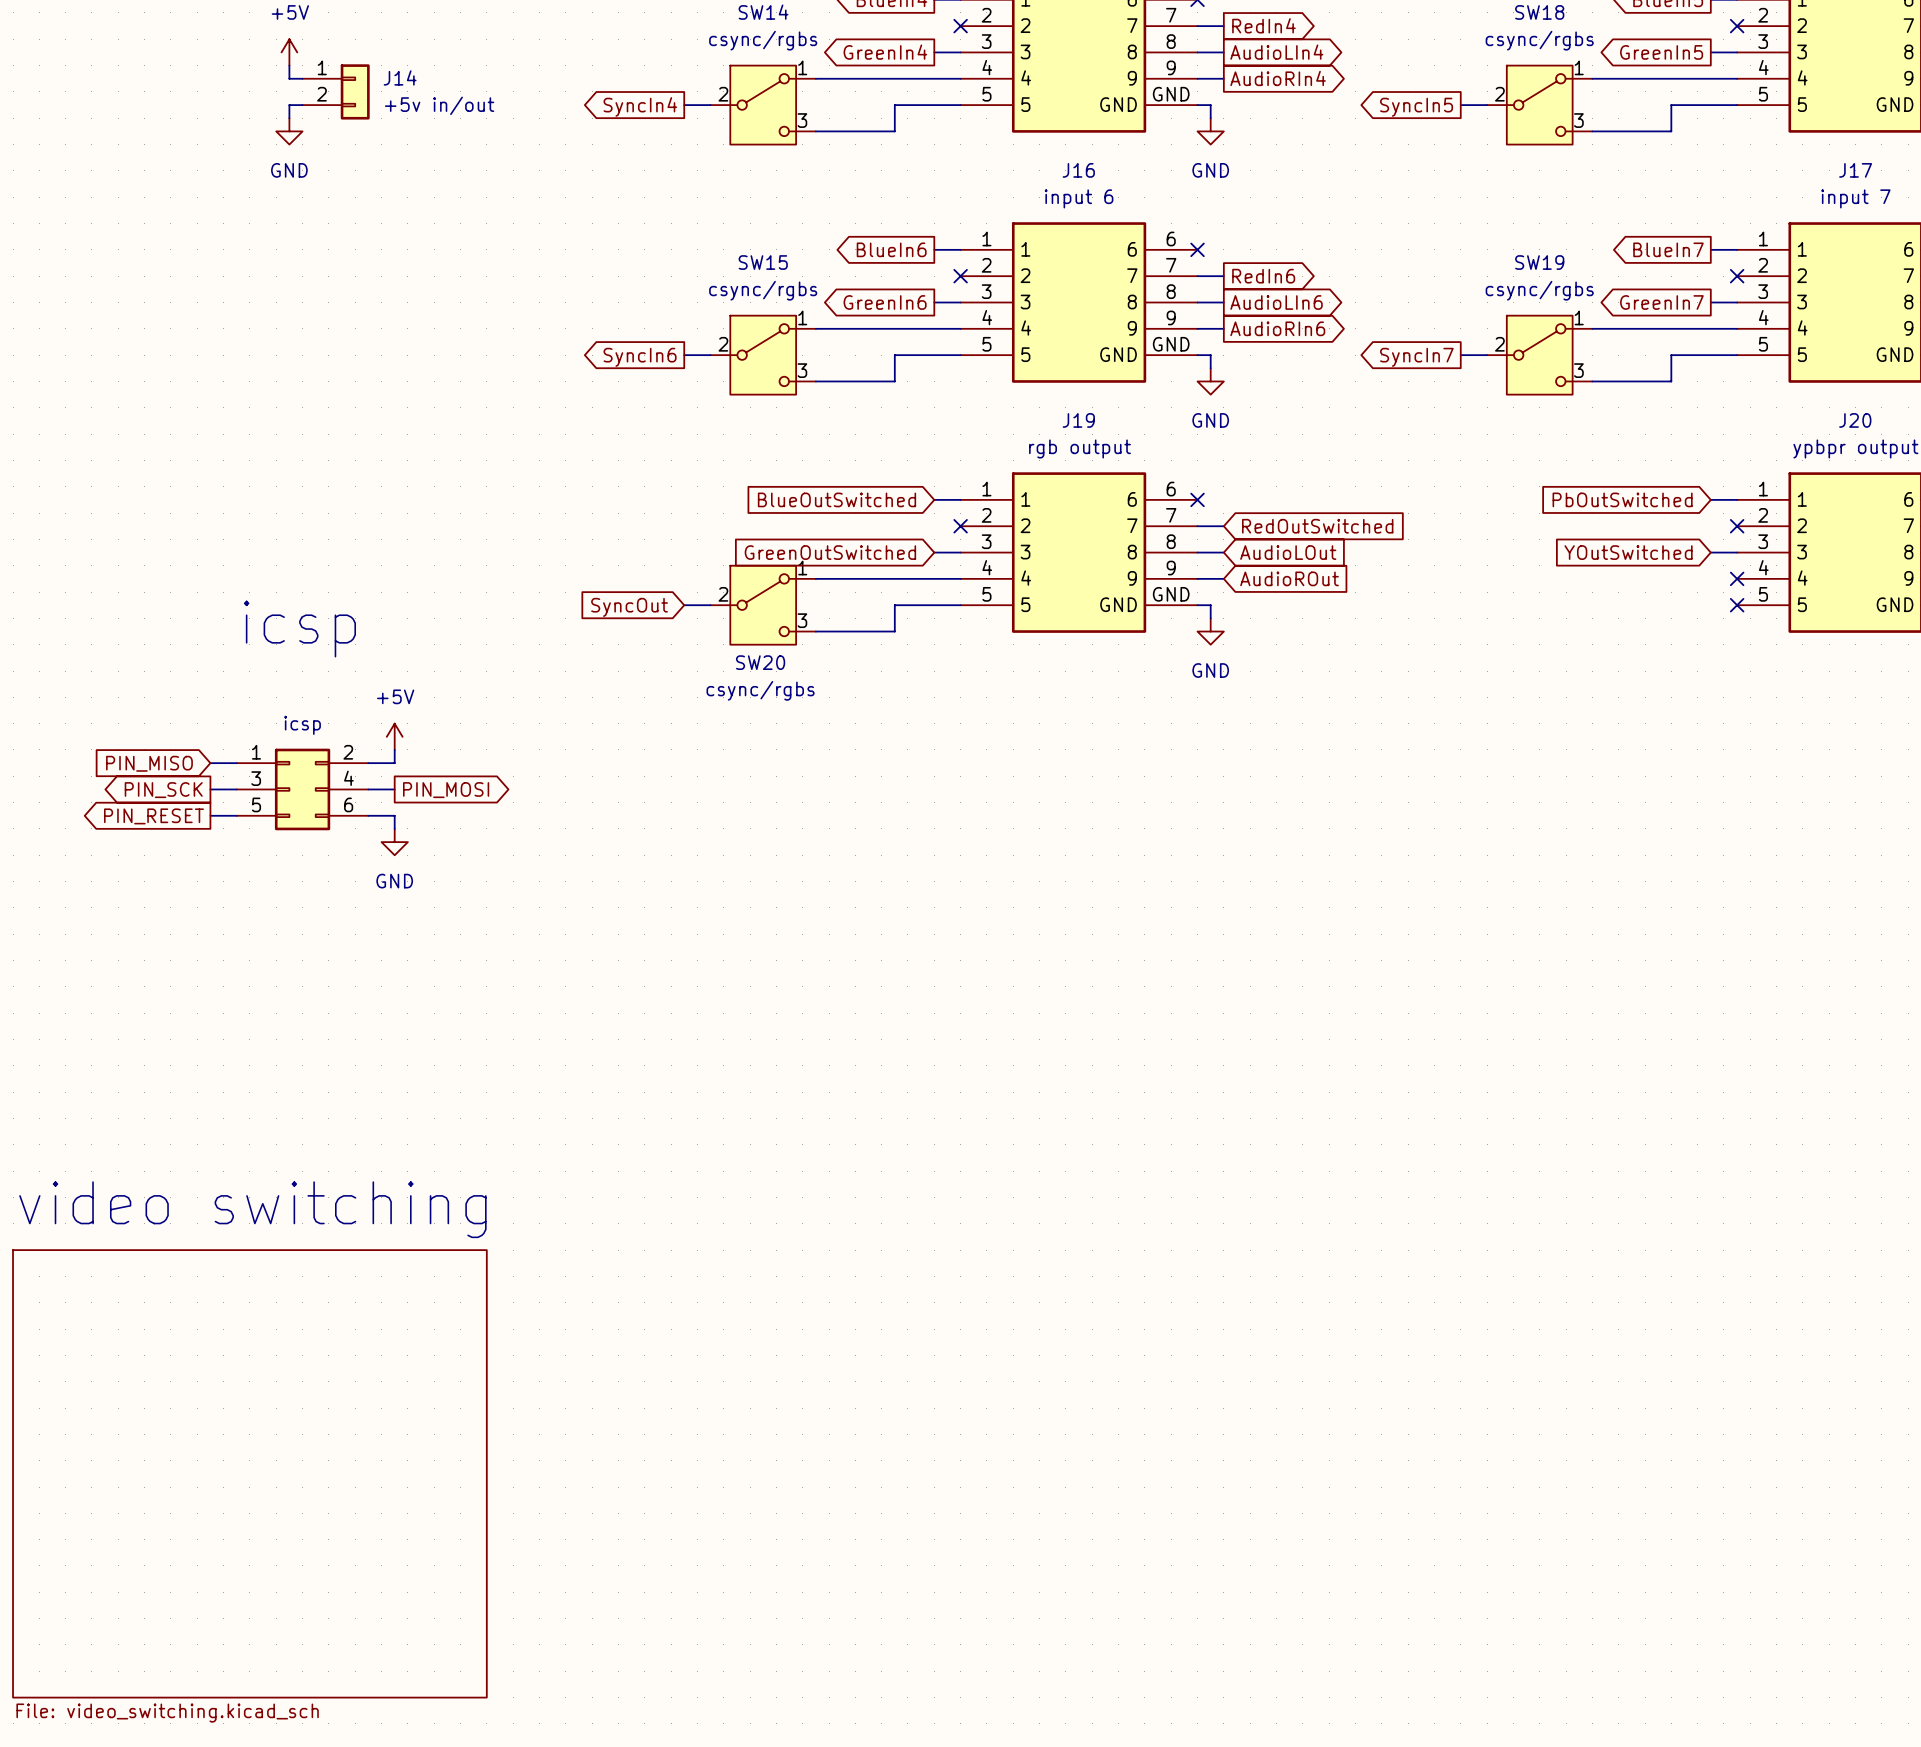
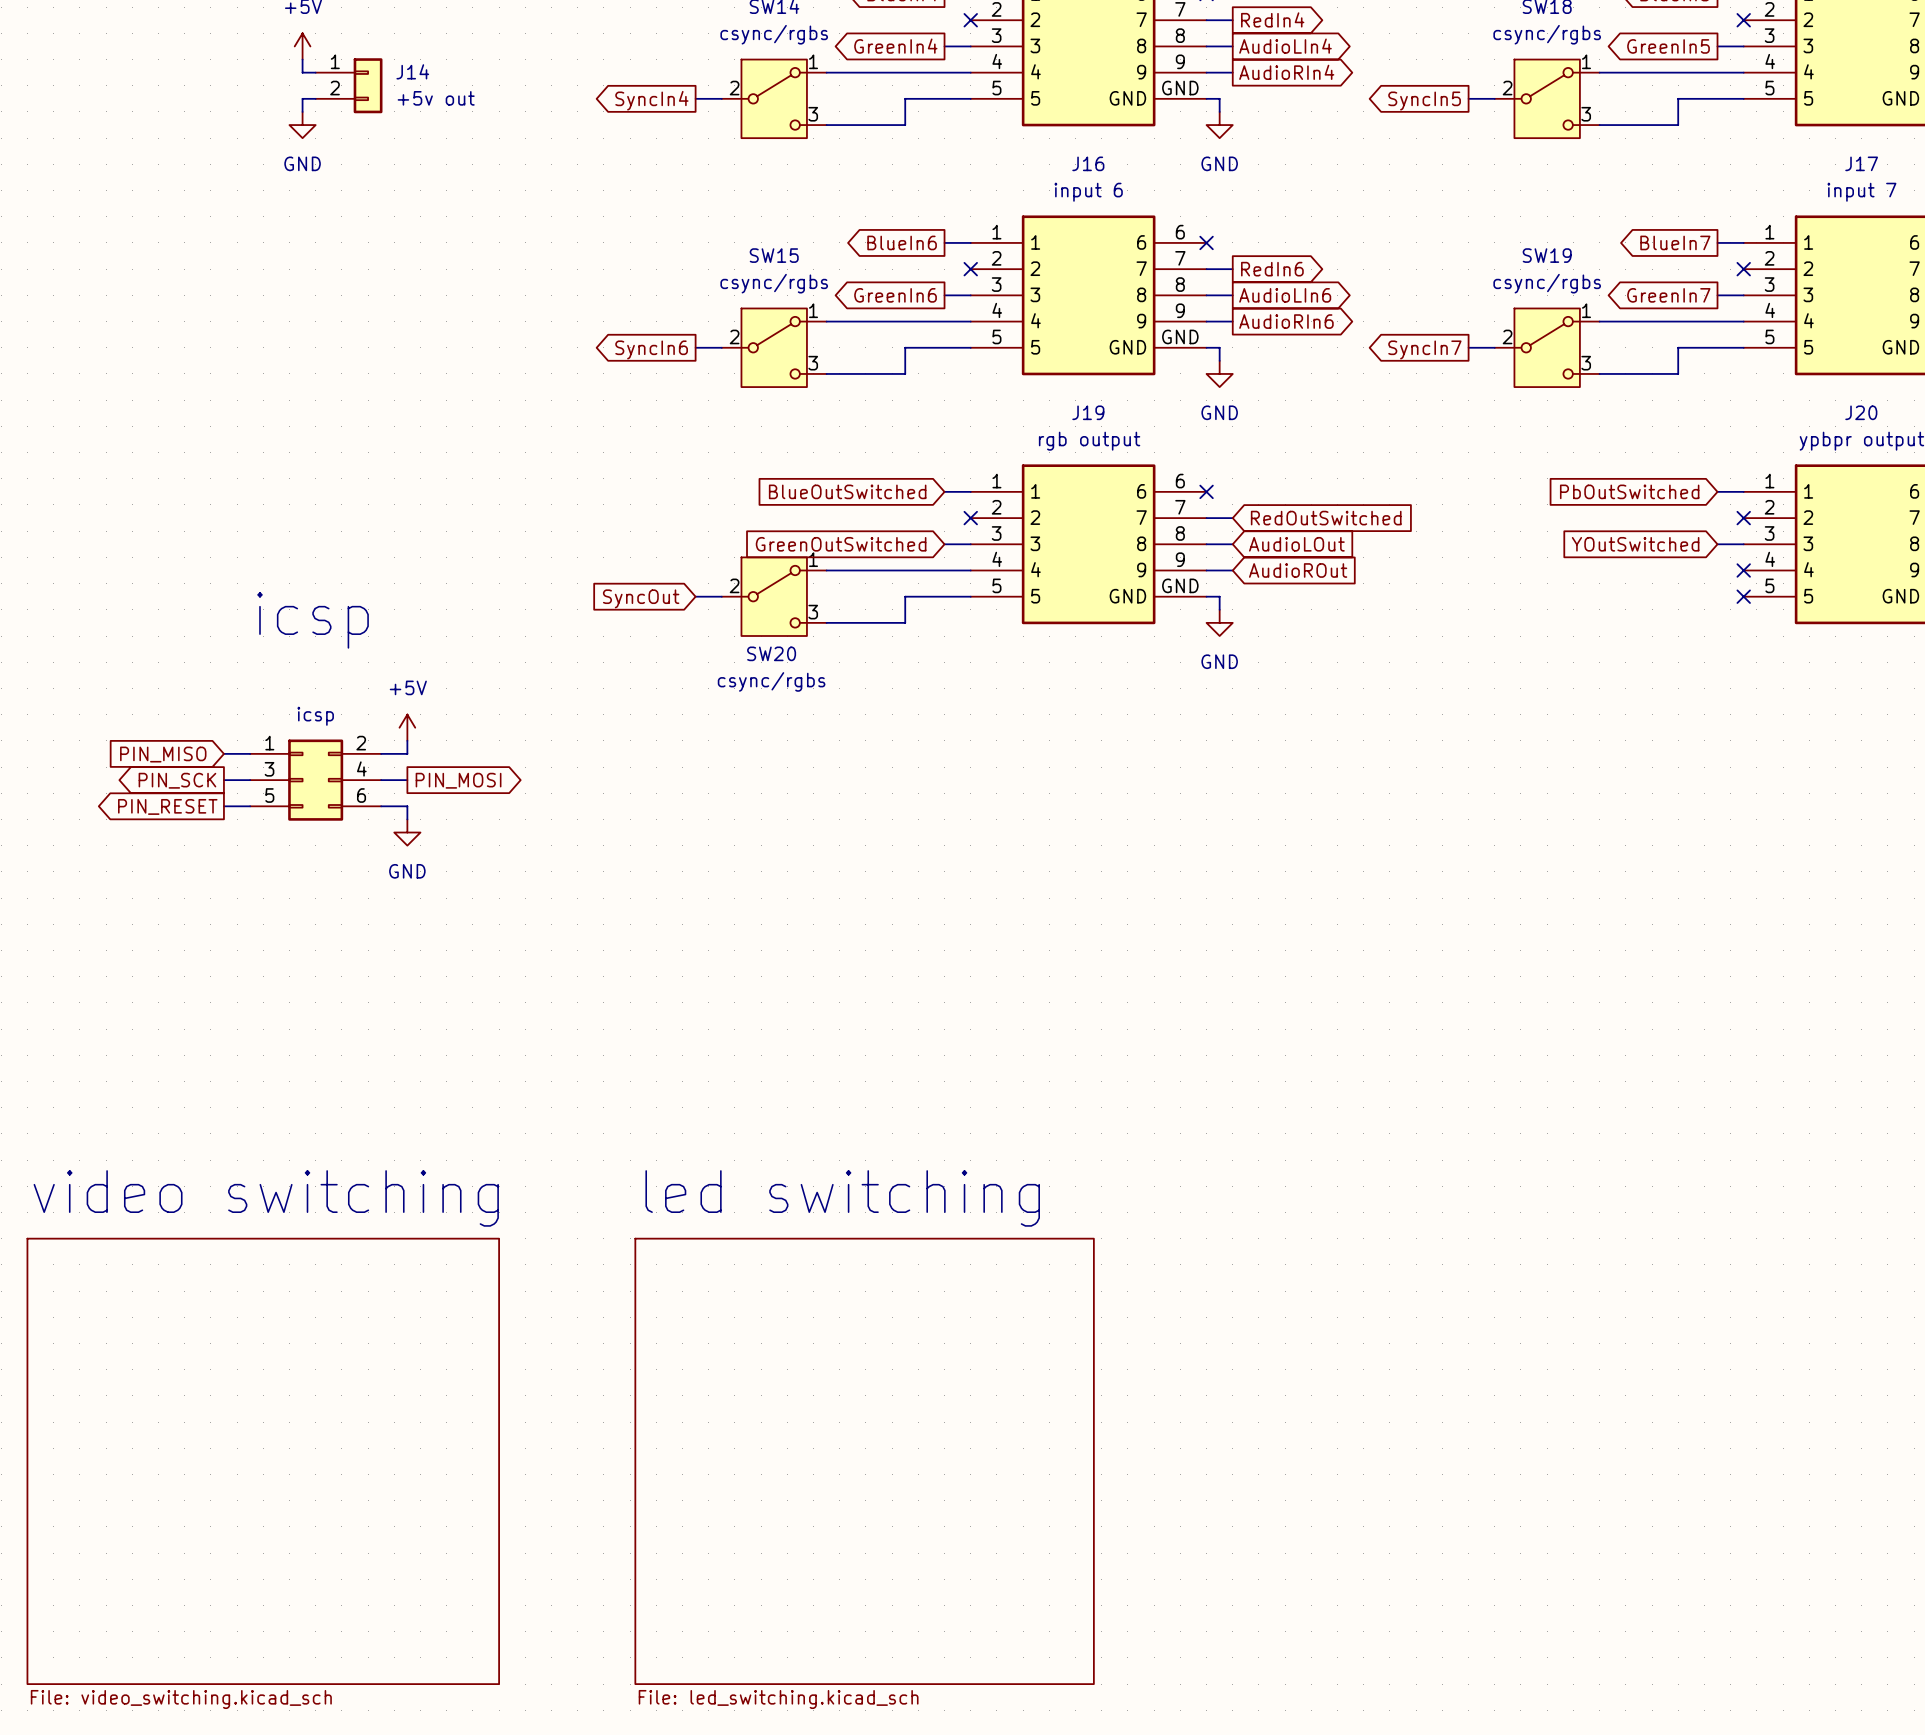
J14 value: +5v in/out (439, 105) -> +5v out (436, 98)
sheet led switching: none -> File: led_switching.kicad_sch (864, 1461)

